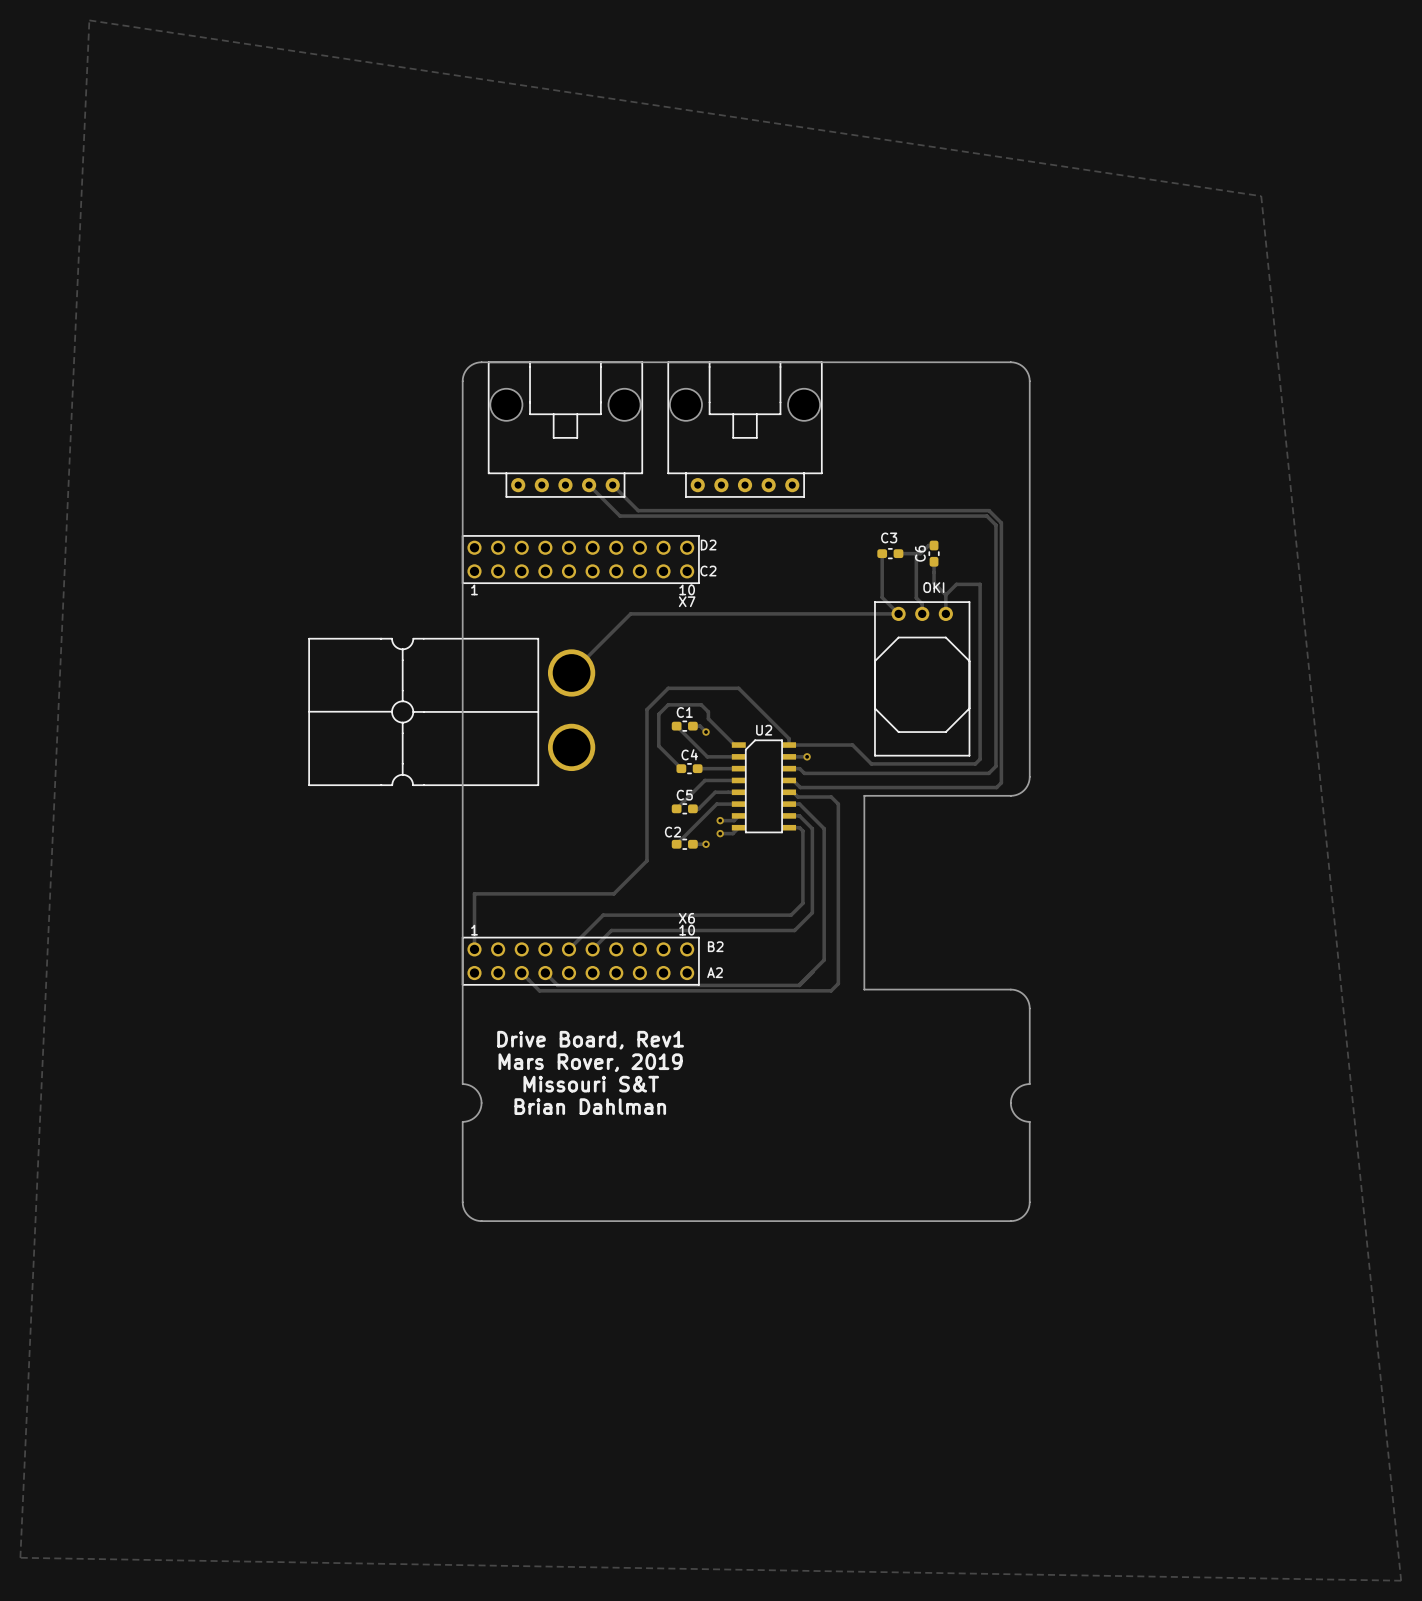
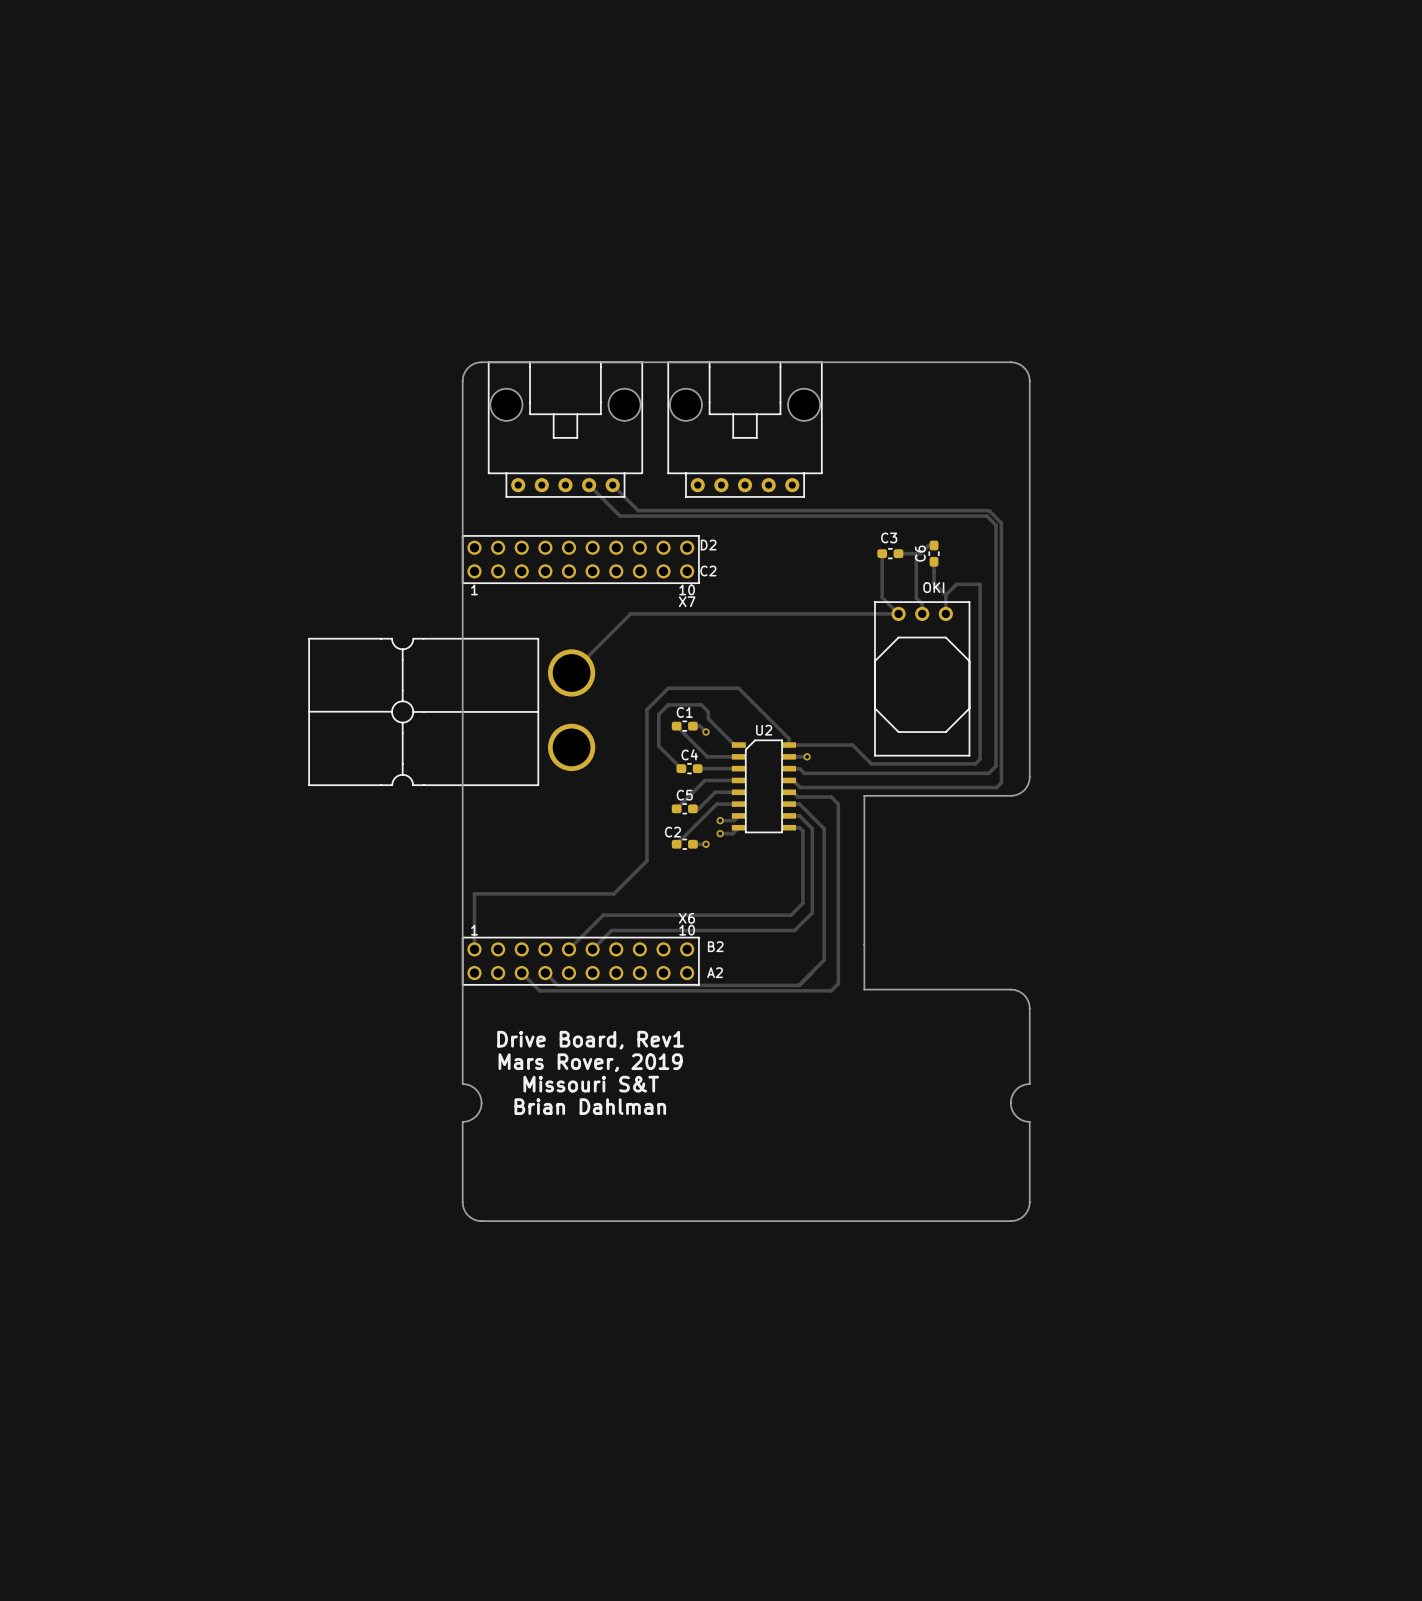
zone outline: (89, 20) (20, 1557) (1401, 1580) (1261, 196) (89, 20) -> none

